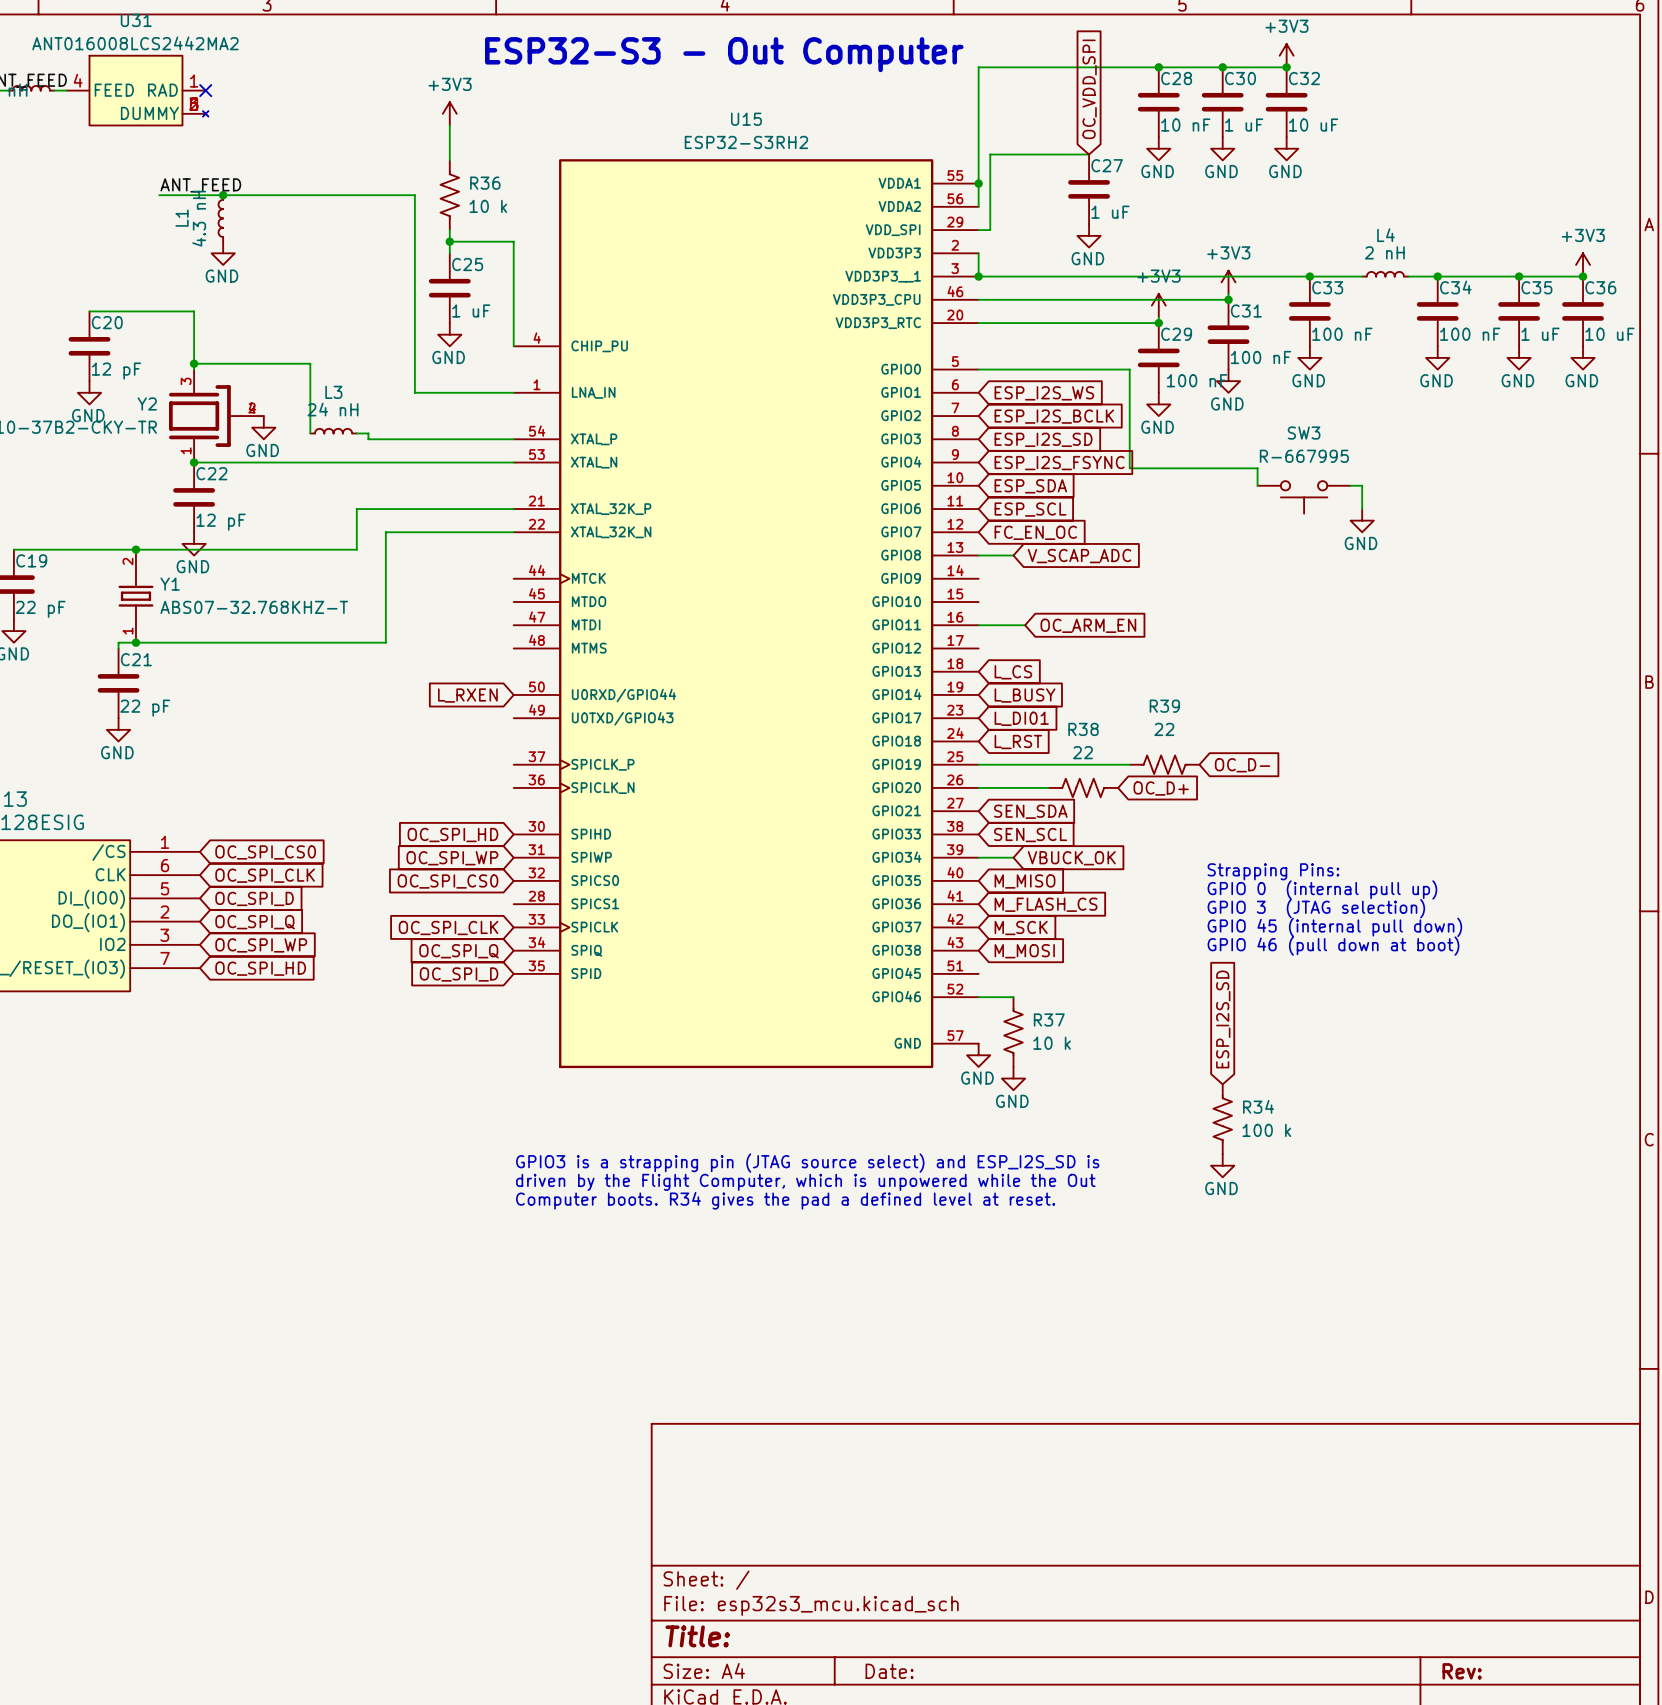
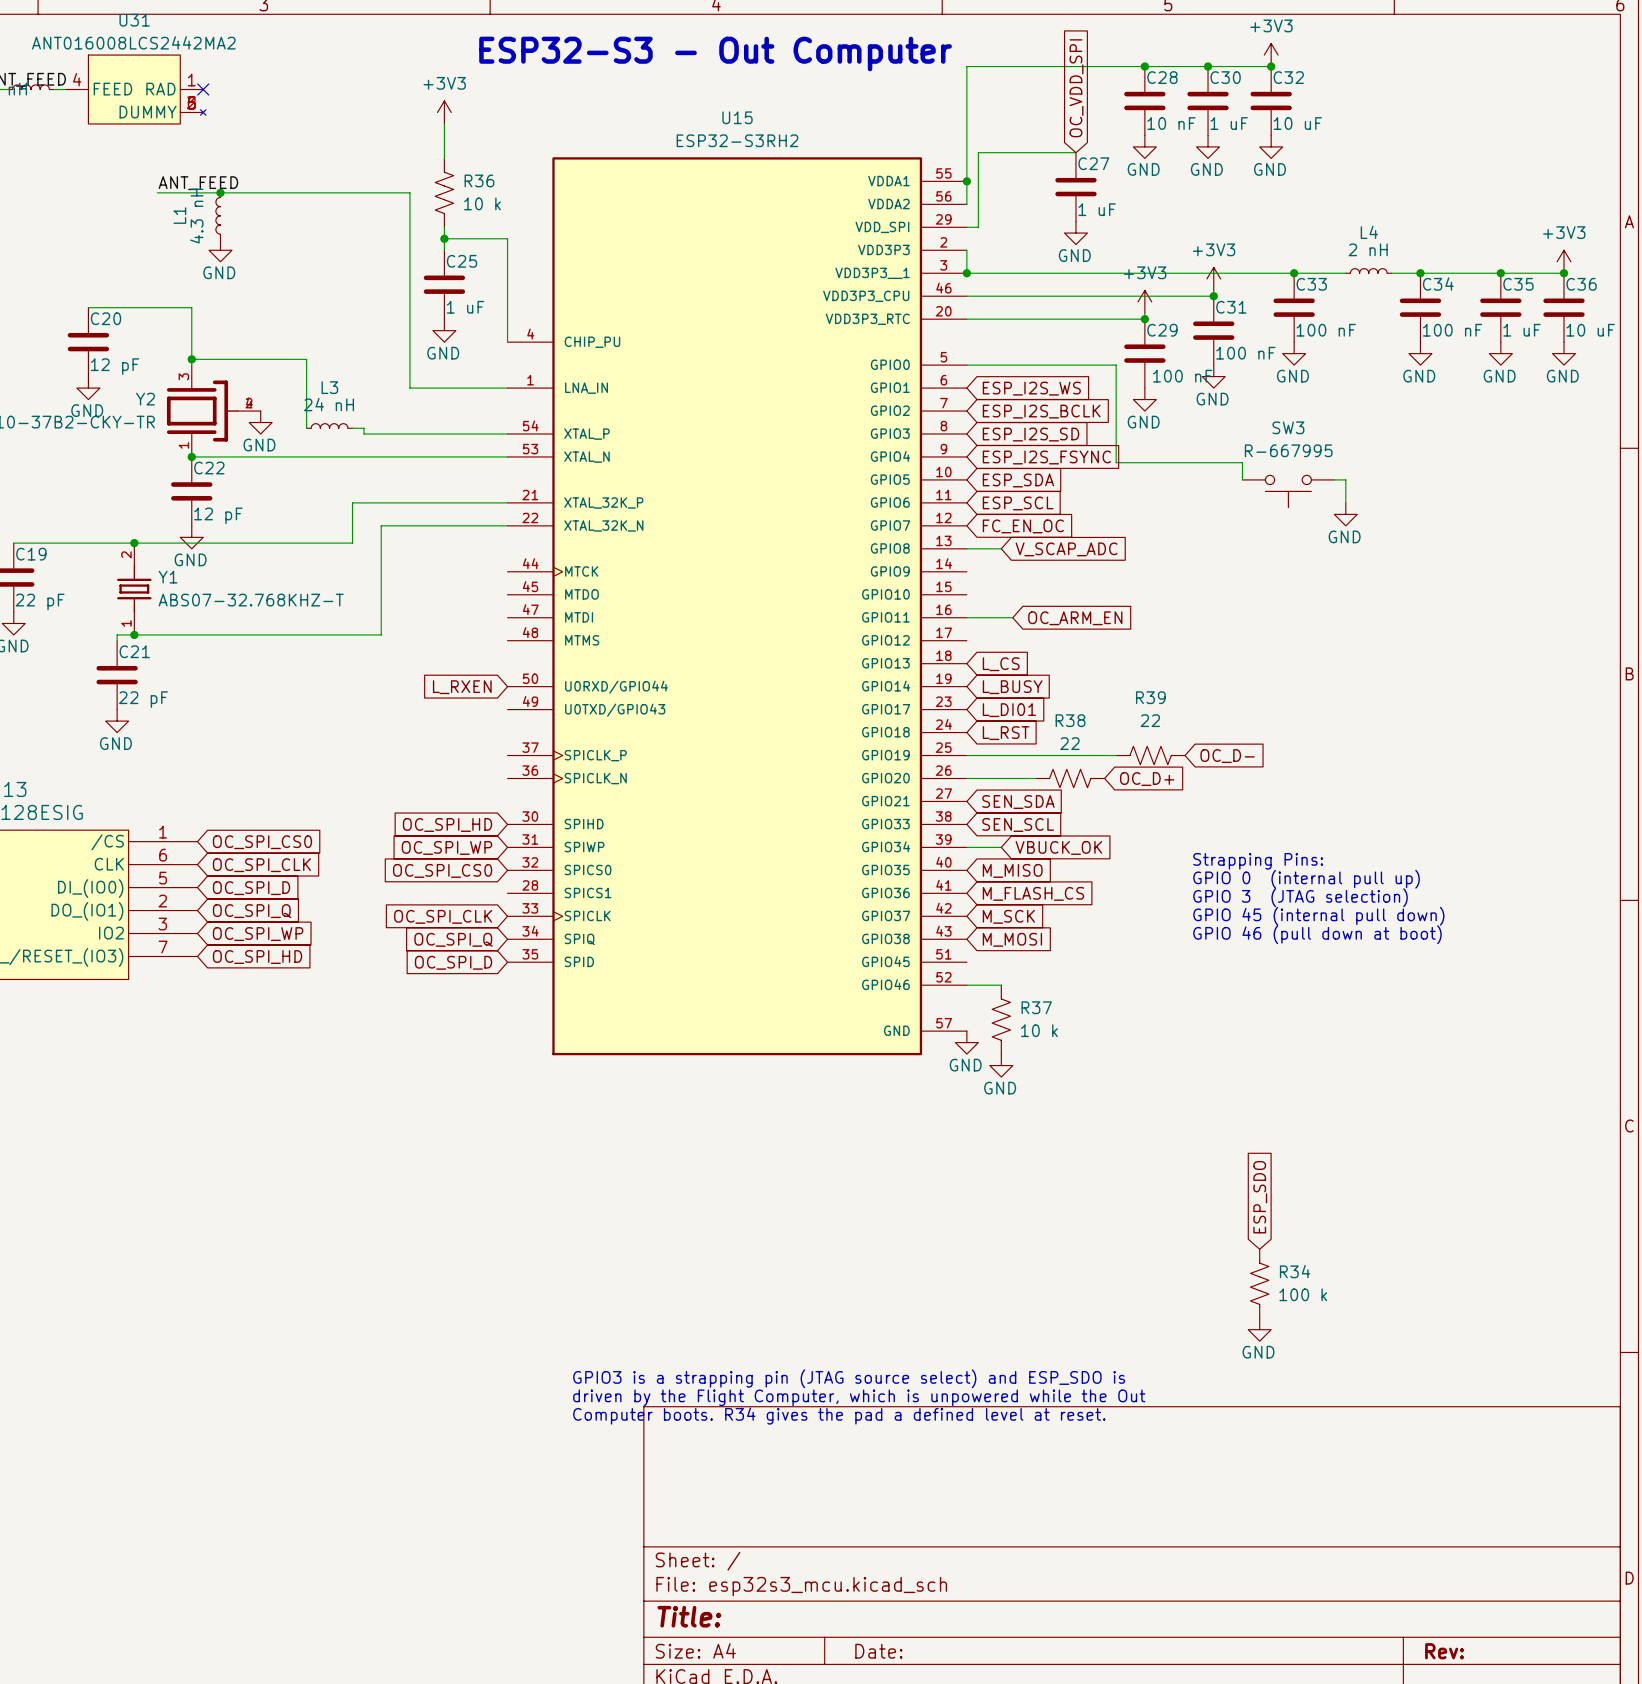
global label: ESP_I2S_SD (1223, 1019) -> none
R34 position: (1222, 1119) -> (1259, 1283)
text: GPIO3 is a strapping pin (JTAG source select) and ESP_I2S_SD is (807, 1163) -> none
power symbol position: GND (1222, 1165) -> GND (1259, 1329)
text: driven by the Flight Computer, which is unpowered while the Out (805, 1182) -> none
text: Computer boots. R34 gives the pad a defined level at reset. (785, 1200) -> none
global label: none -> ESP_SDO (1260, 1197)
text: none -> GPIO3 is a strapping pin (JTAG source select) and ESP_SDO is (849, 1378)
text: none -> driven by the Flight Computer, which is unpowered while the Out (859, 1397)
text: none -> Computer boots. R34 gives the pad a defined level at reset. (839, 1416)

